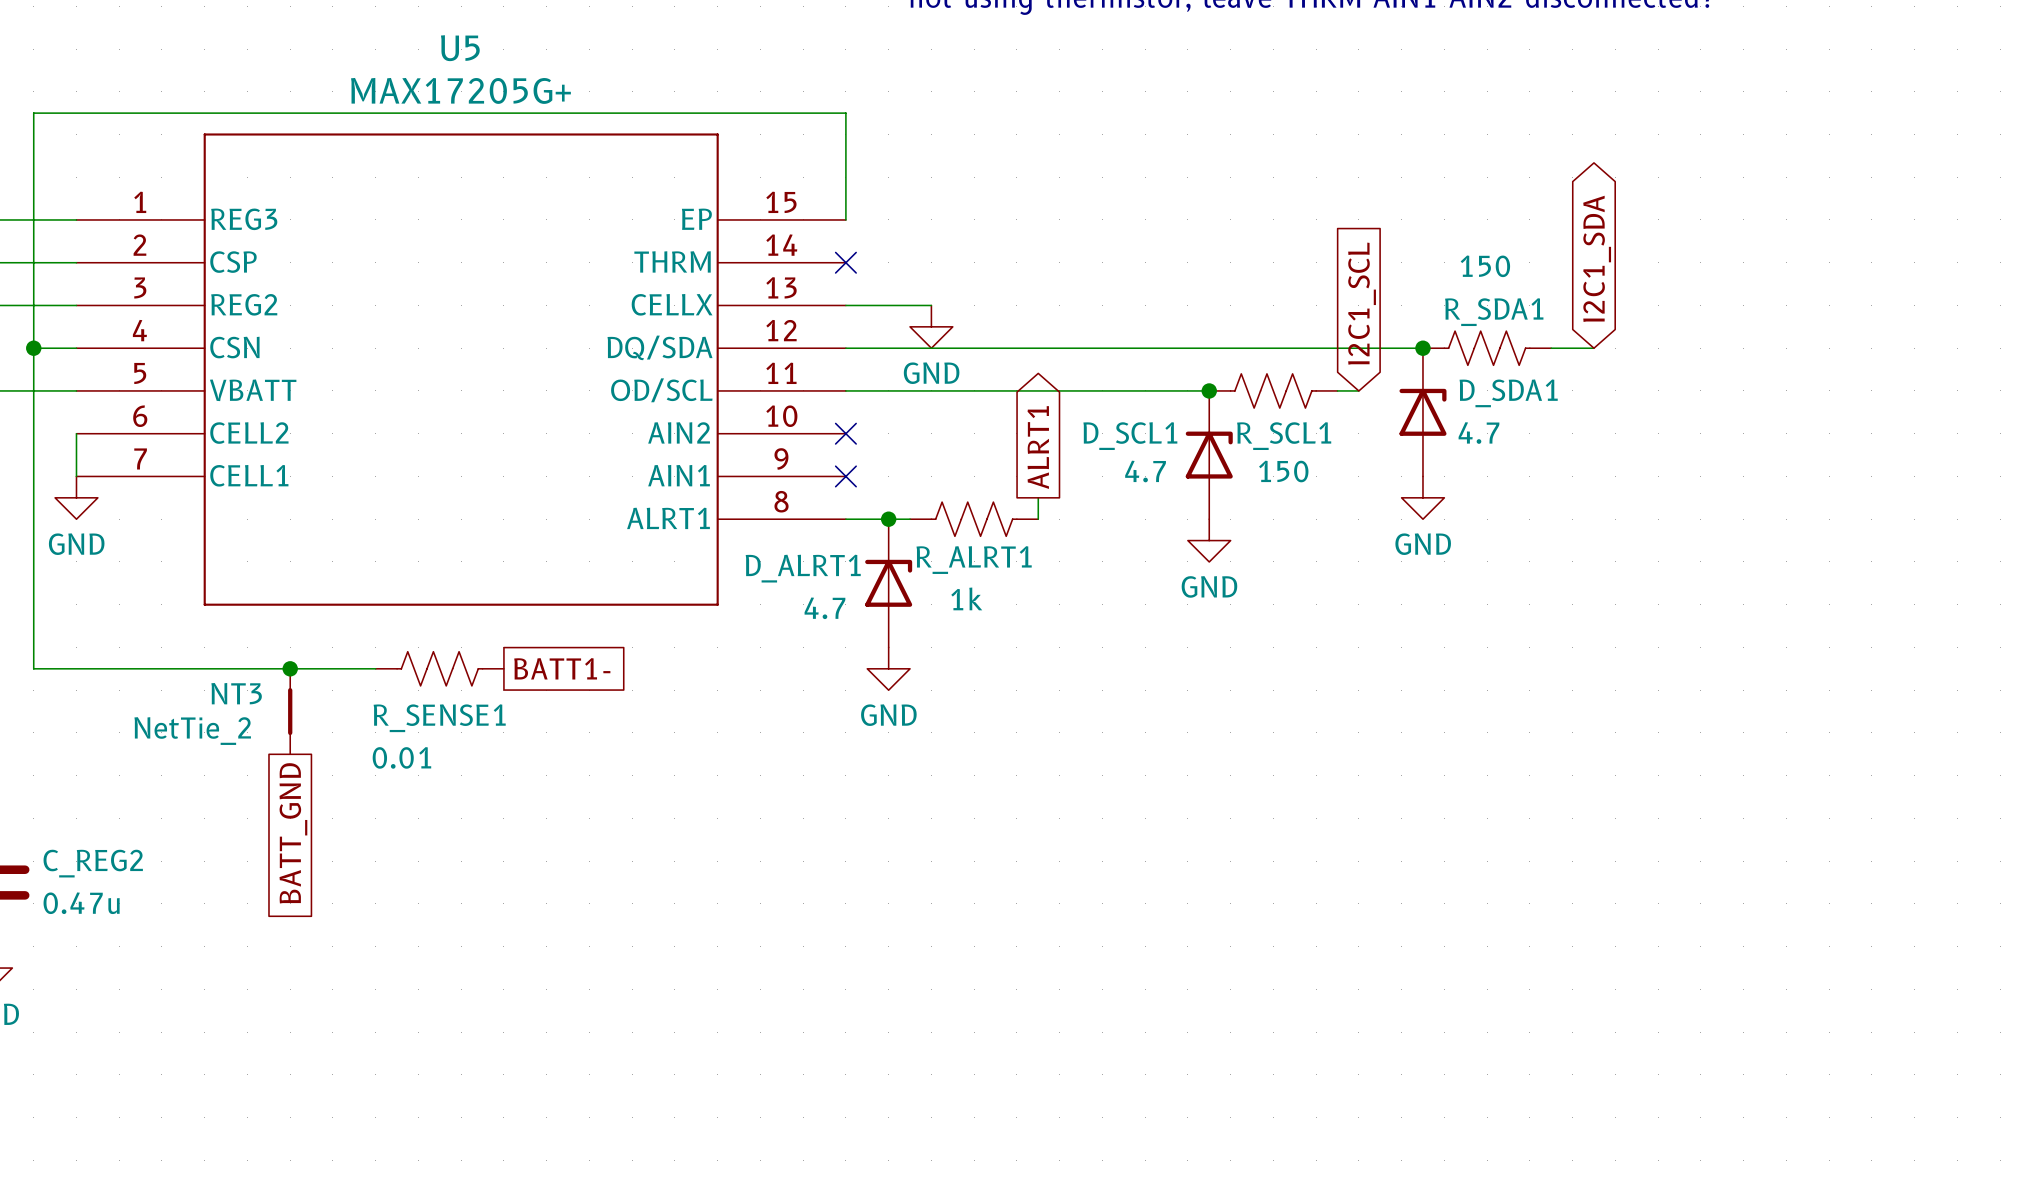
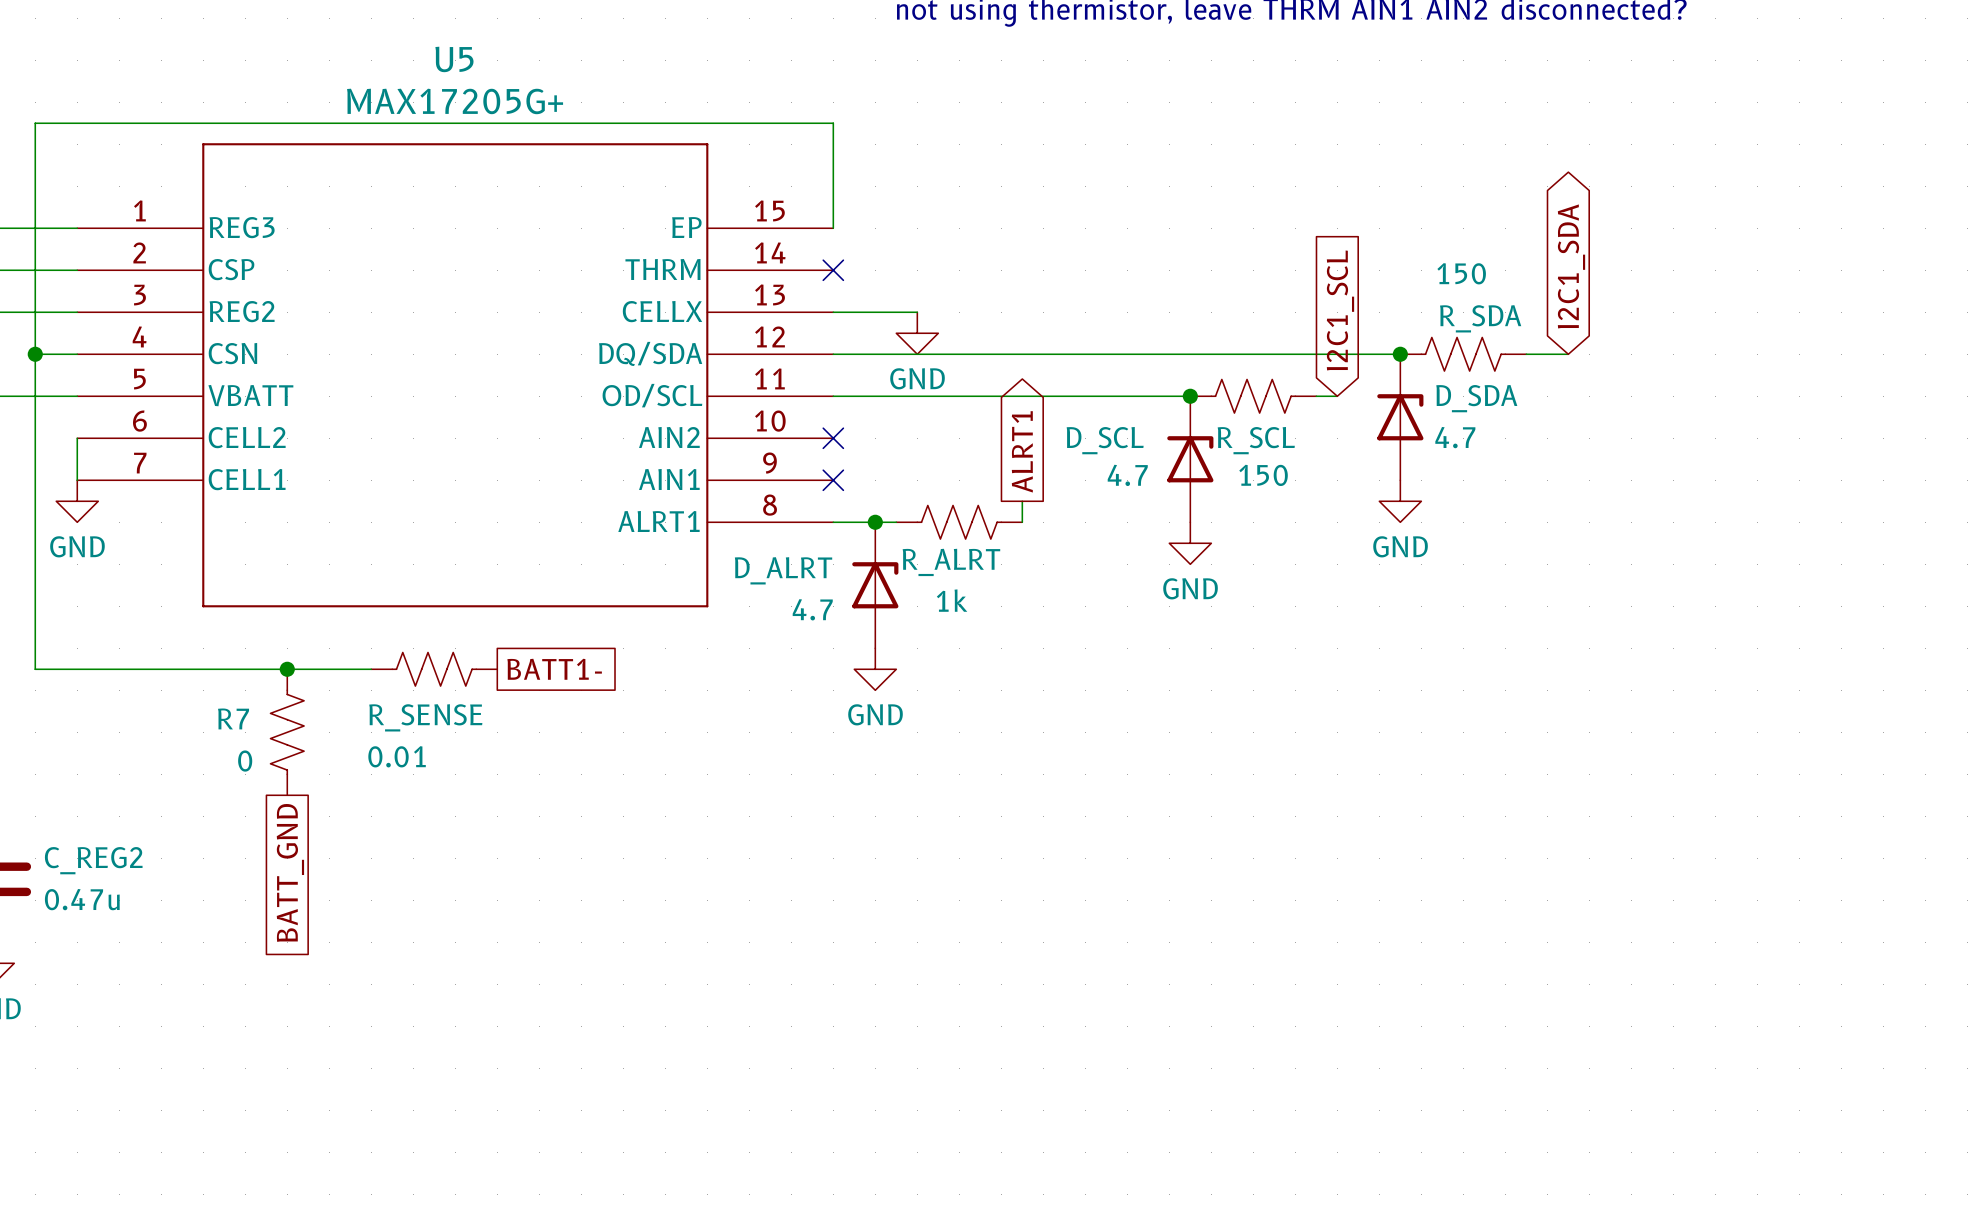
R_SDA1 name: R_SDA1 (1494, 312) -> R_SDA (1480, 318)
D_SDA1 name: D_SDA1 (1508, 393) -> D_SDA (1476, 398)
D_SCL1 name: D_SCL1 (1130, 436) -> D_SCL (1105, 440)
R_SCL1 name: R_SCL1 (1284, 436) -> R_SCL (1256, 440)
R_ALRT1 name: R_ALRT1 (974, 560) -> R_ALRT (951, 562)
D_ALRT1 name: D_ALRT1 (803, 568) -> D_ALRT (783, 570)
NT3: NetTie_2 (290, 711) -> none
R_SENSE1 name: R_SENSE1 (439, 718) -> R_SENSE (425, 717)
R7: none -> 0 (287, 732)
global label position: BATT_GND (293, 833) -> BATT_GND (290, 872)

